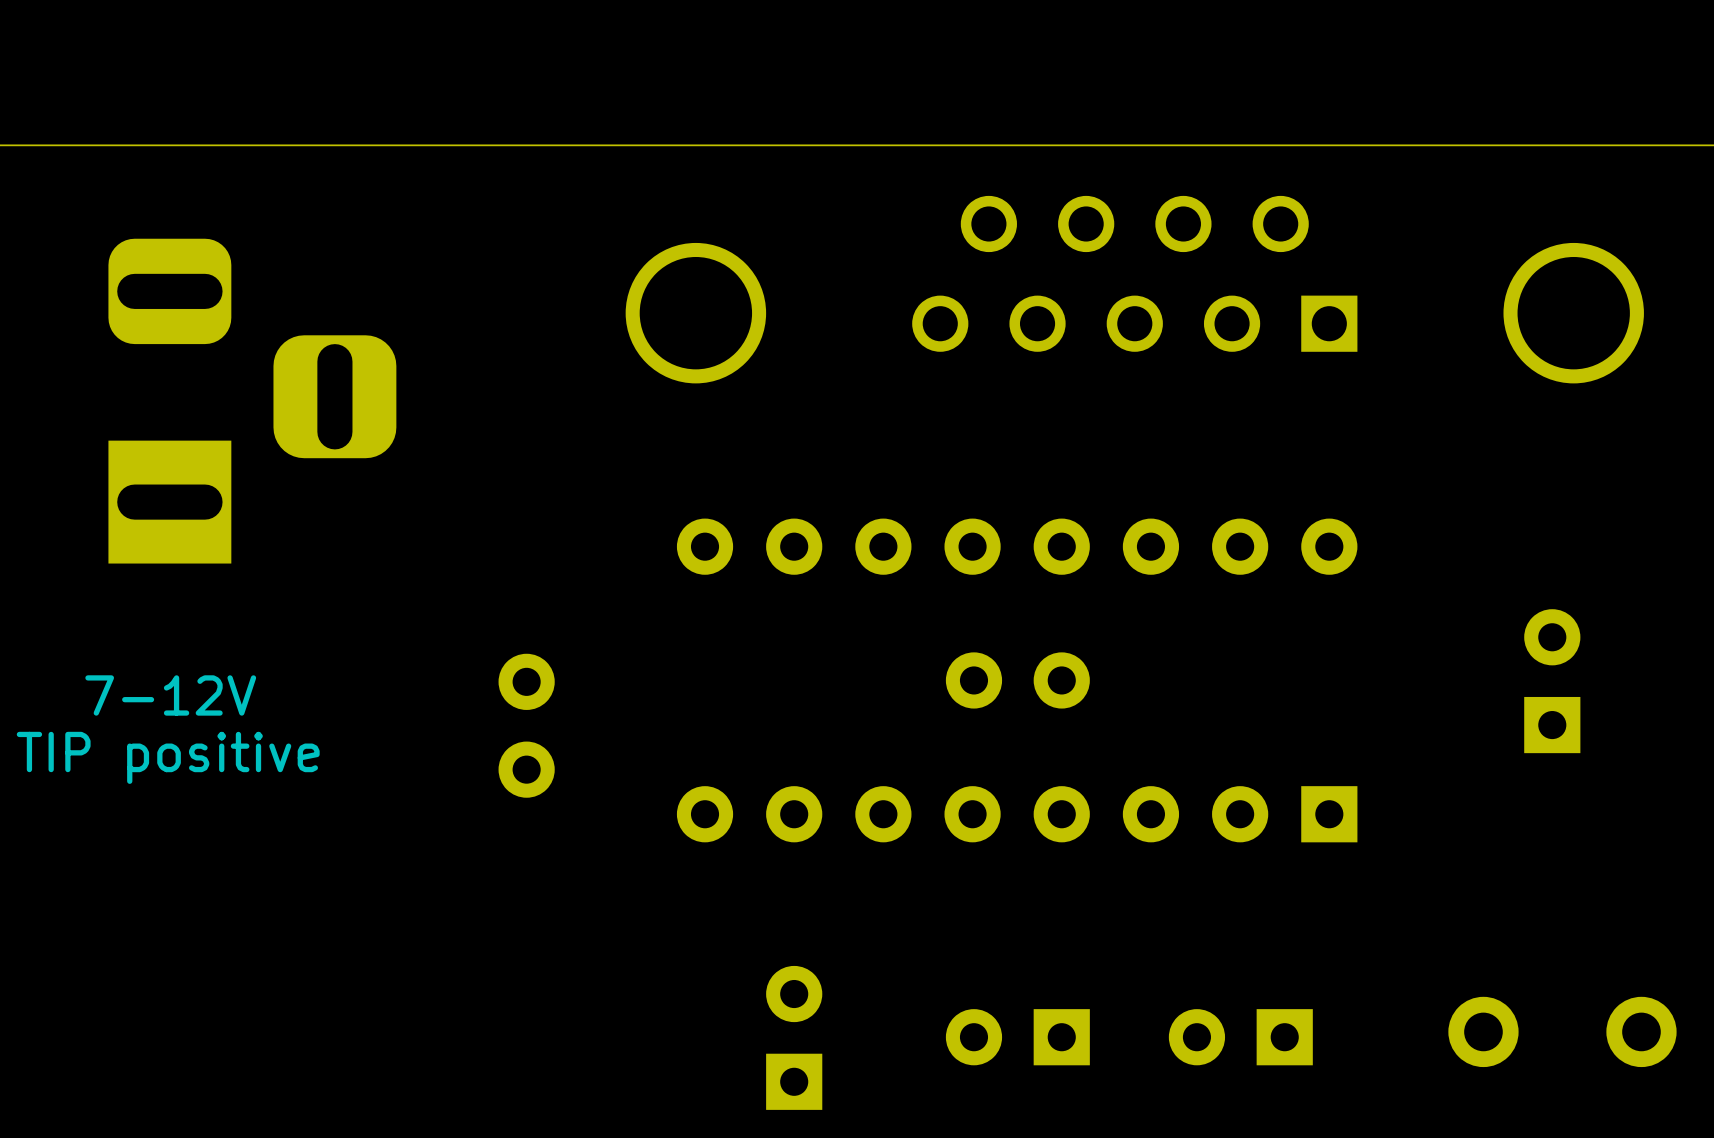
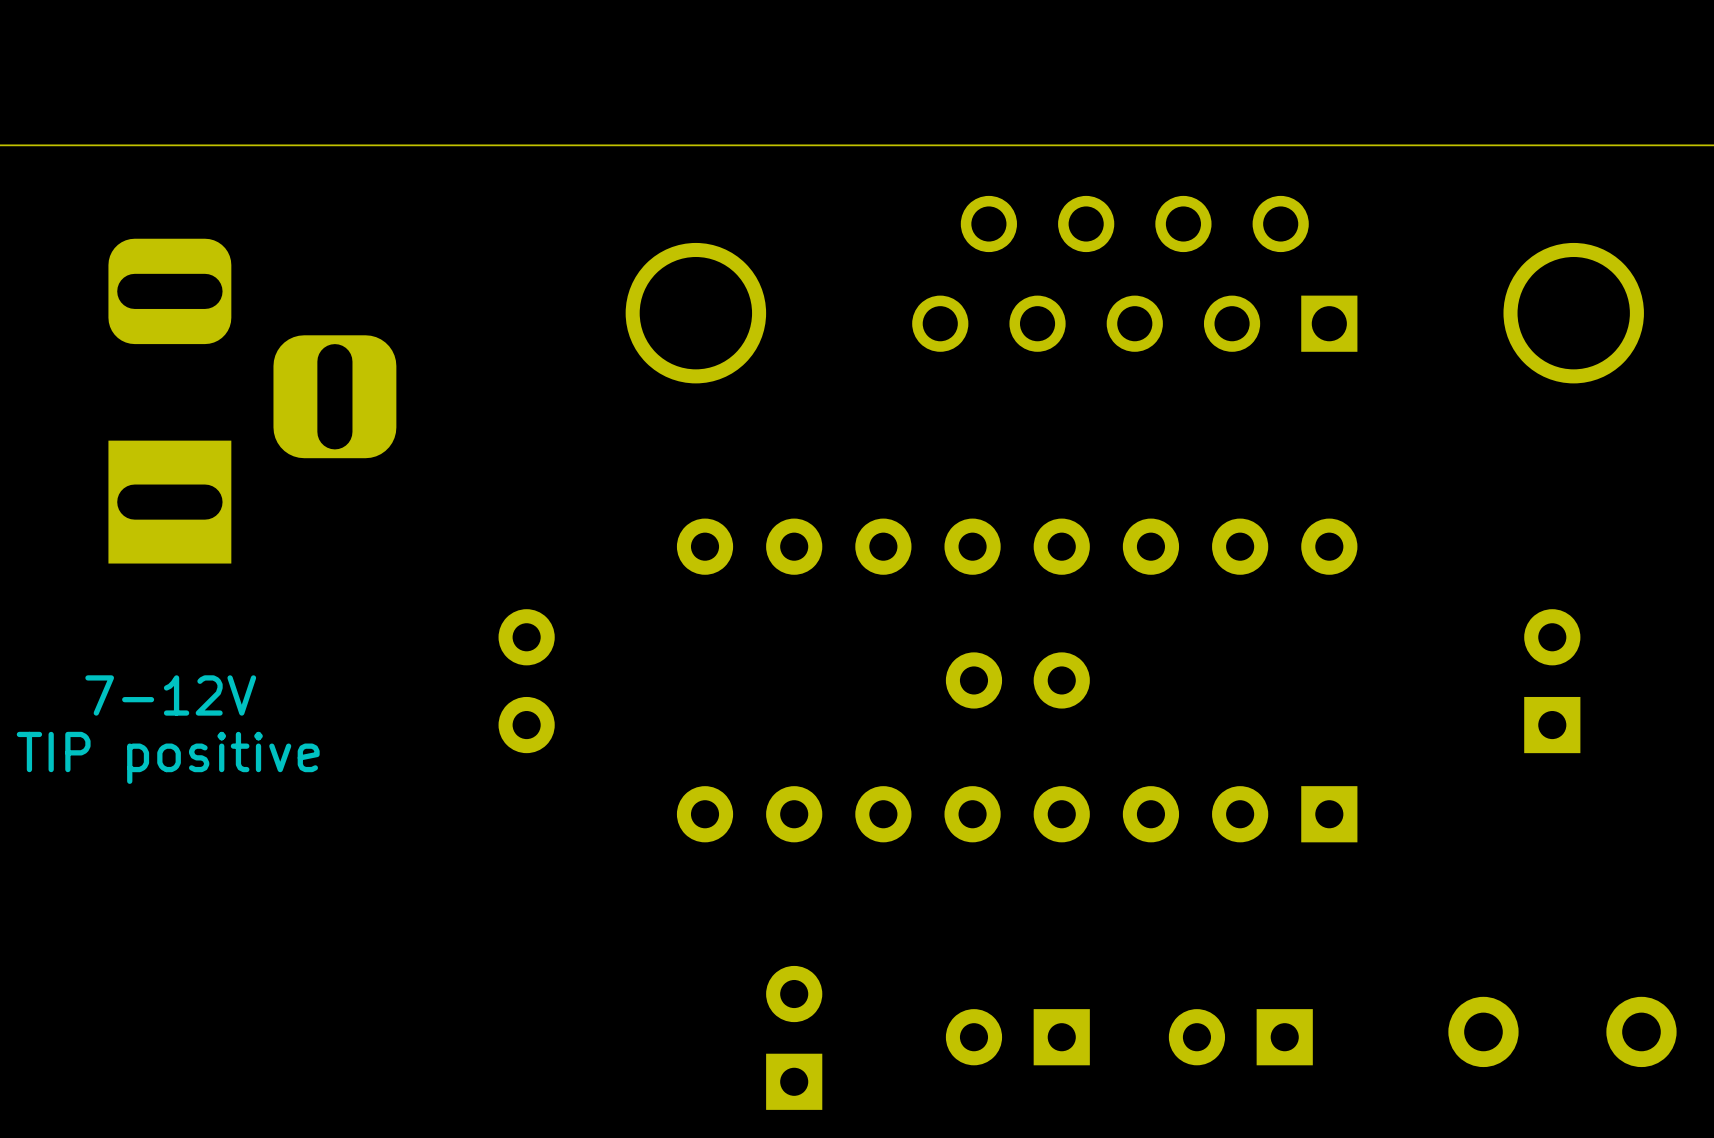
part position: (526, 725) -> (526, 681)

